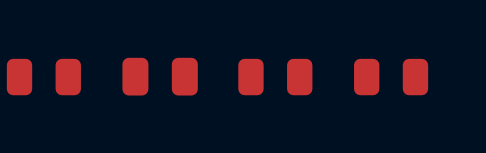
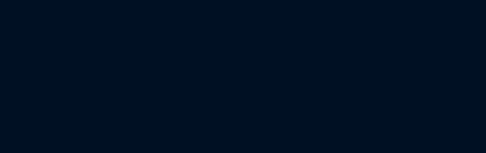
part: (160, 76) -> none
part: (43, 77) -> none
part: (275, 77) -> none
part: (391, 77) -> none

